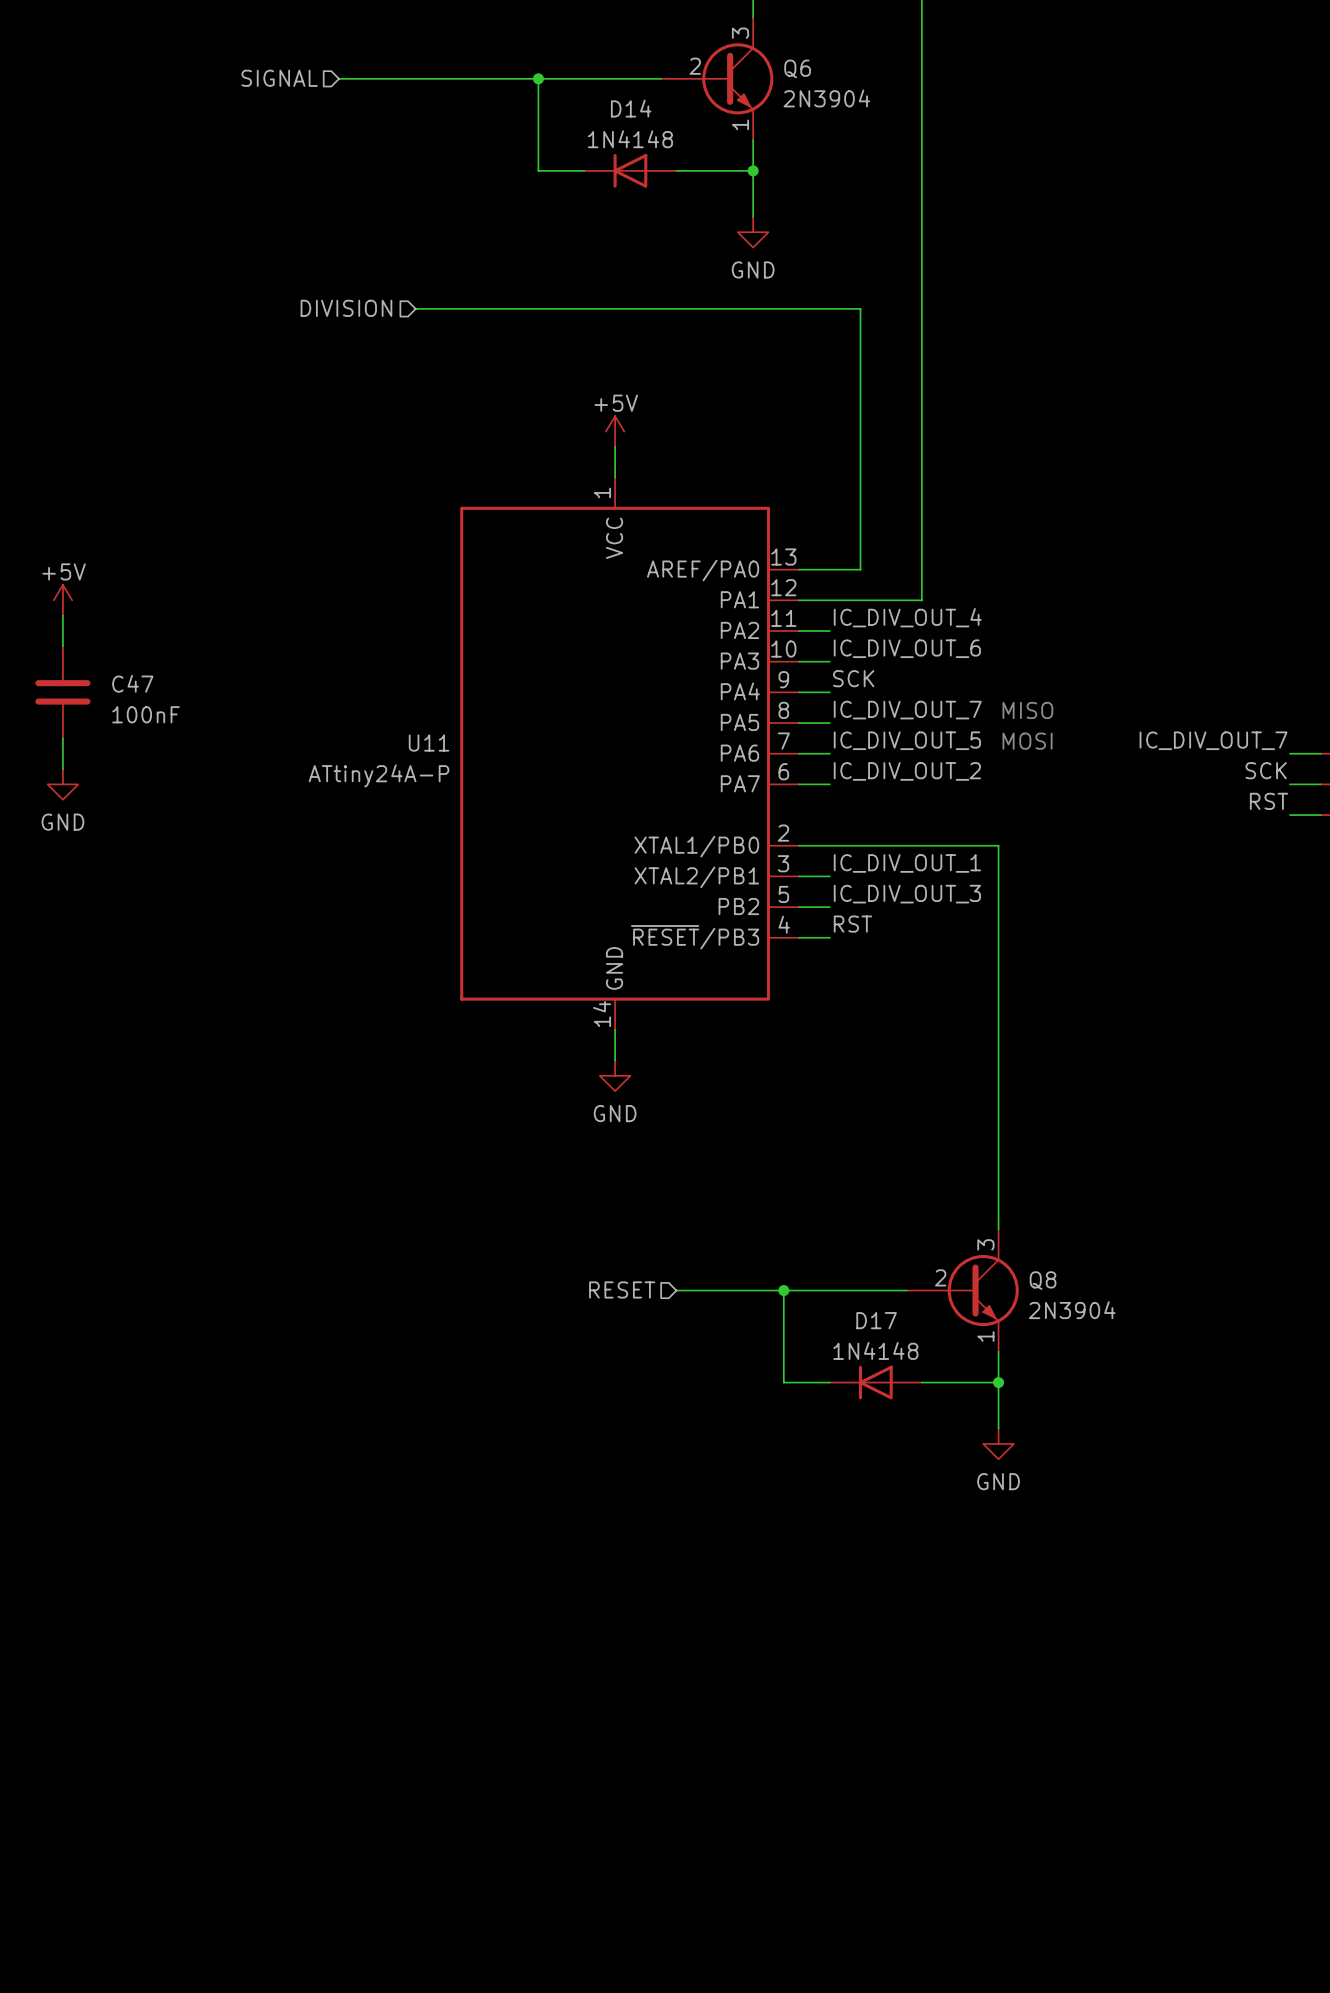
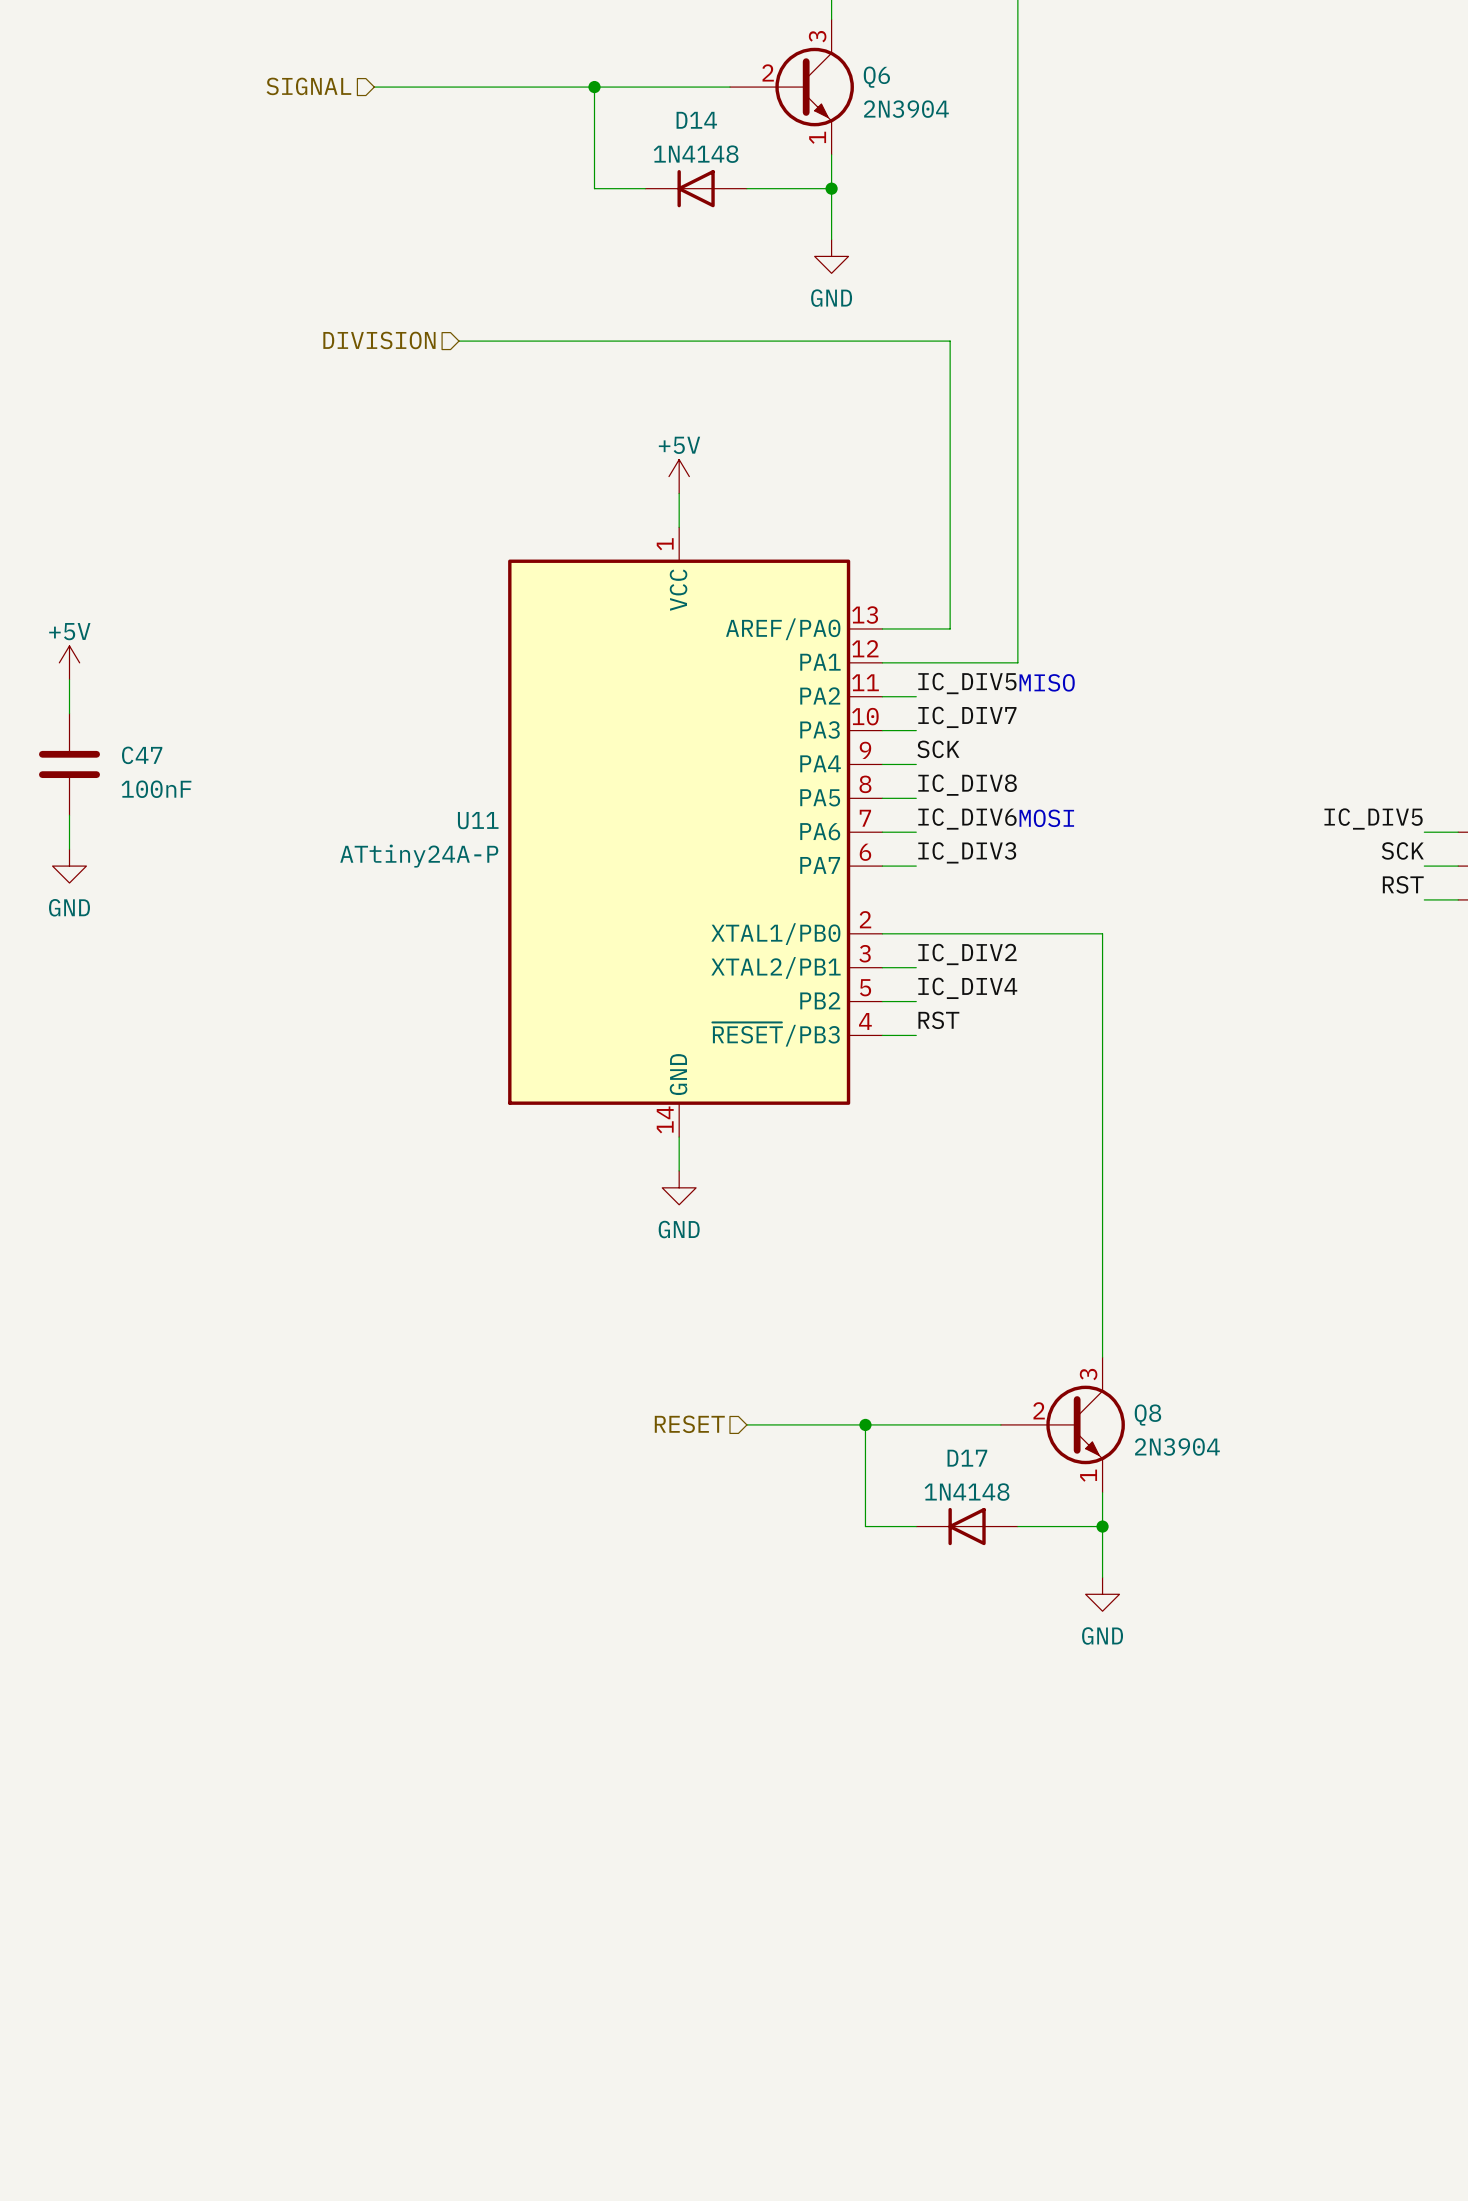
label: IC_DIV_OUT_4 (907, 617) -> IC_DIV5 (967, 683)
label: IC_DIV_OUT_6 (907, 648) -> IC_DIV7 (967, 717)
label: IC_DIV_OUT_7 (907, 710) -> IC_DIV8 (967, 785)
text position: MISO (1027, 710) -> MISO (1047, 682)
label: IC_DIV_OUT_5 (907, 740) -> IC_DIV6 (967, 819)
label: IC_DIV_OUT_7 (1213, 740) -> IC_DIV5 (1373, 819)
text position: MOSI (1027, 741) -> MOSI (1046, 818)
label: IC_DIV_OUT_2 (907, 771) -> IC_DIV3 (967, 852)
label: IC_DIV_OUT_1 (907, 863) -> IC_DIV2 (967, 954)
label: IC_DIV_OUT_3 (907, 894) -> IC_DIV4 (967, 988)

